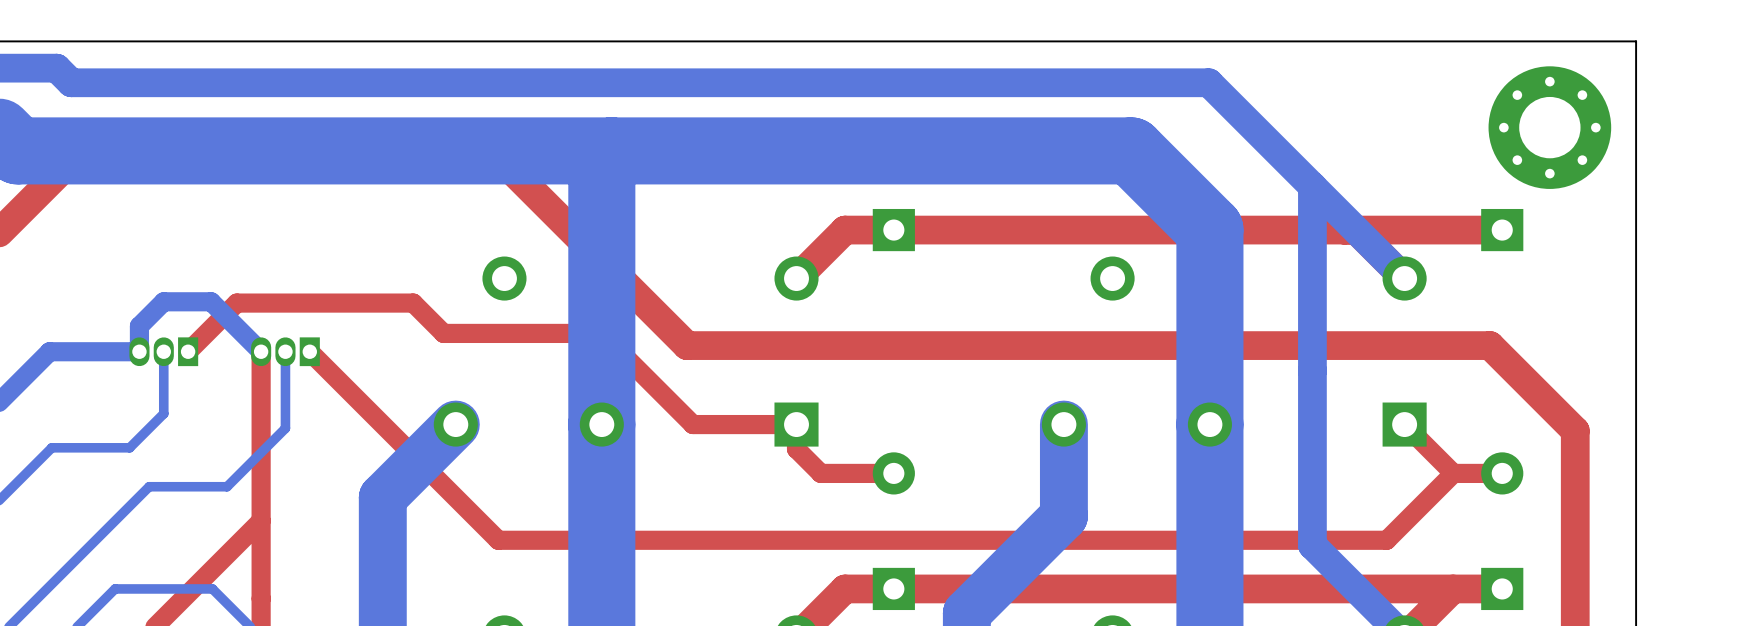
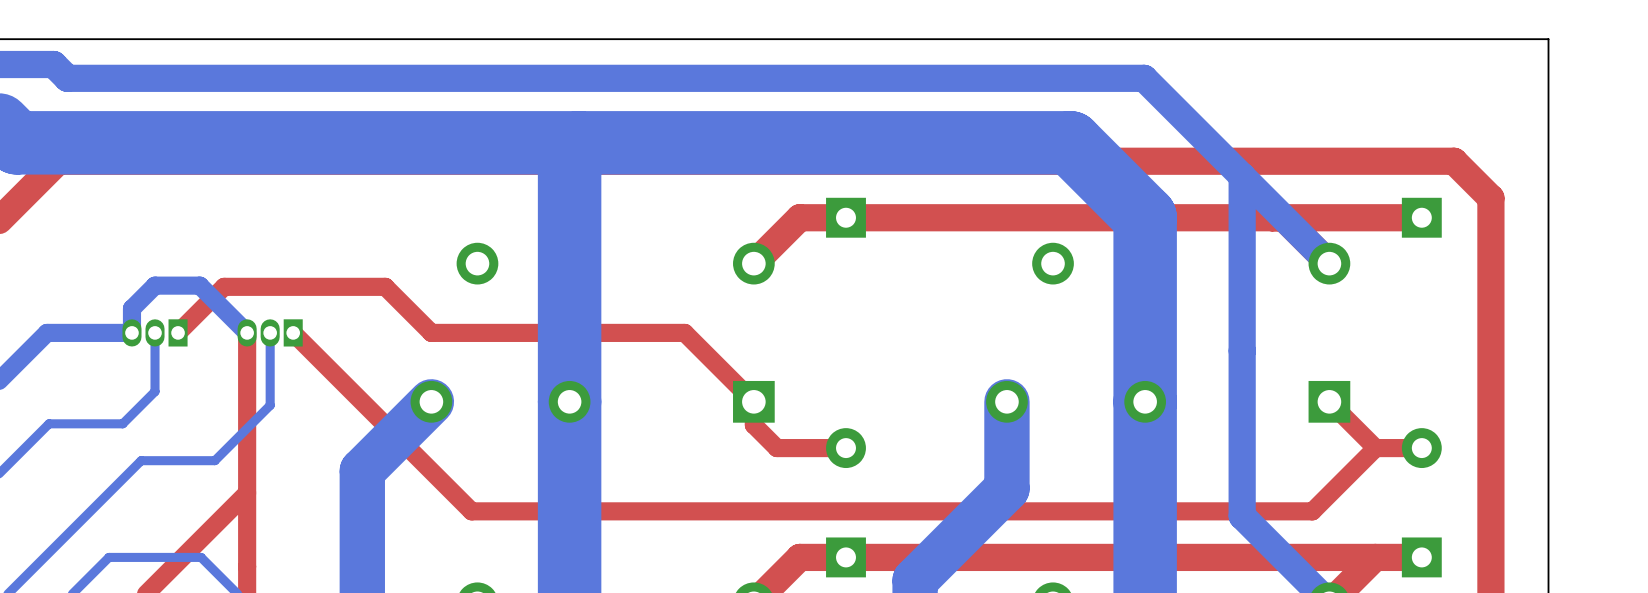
part: (1549, 127) -> none
top track: (61, 170) (81, 150) (492, 150) (687, 345) (1490, 345) (1575, 430) -> (58, 161) (1454, 161) (1490, 198) (1490, 407)
top track: (407, 303) (413, 303) (443, 333) (601, 333) (692, 424) (796, 424) -> (385, 286) (431, 332) (684, 332) (753, 401)

